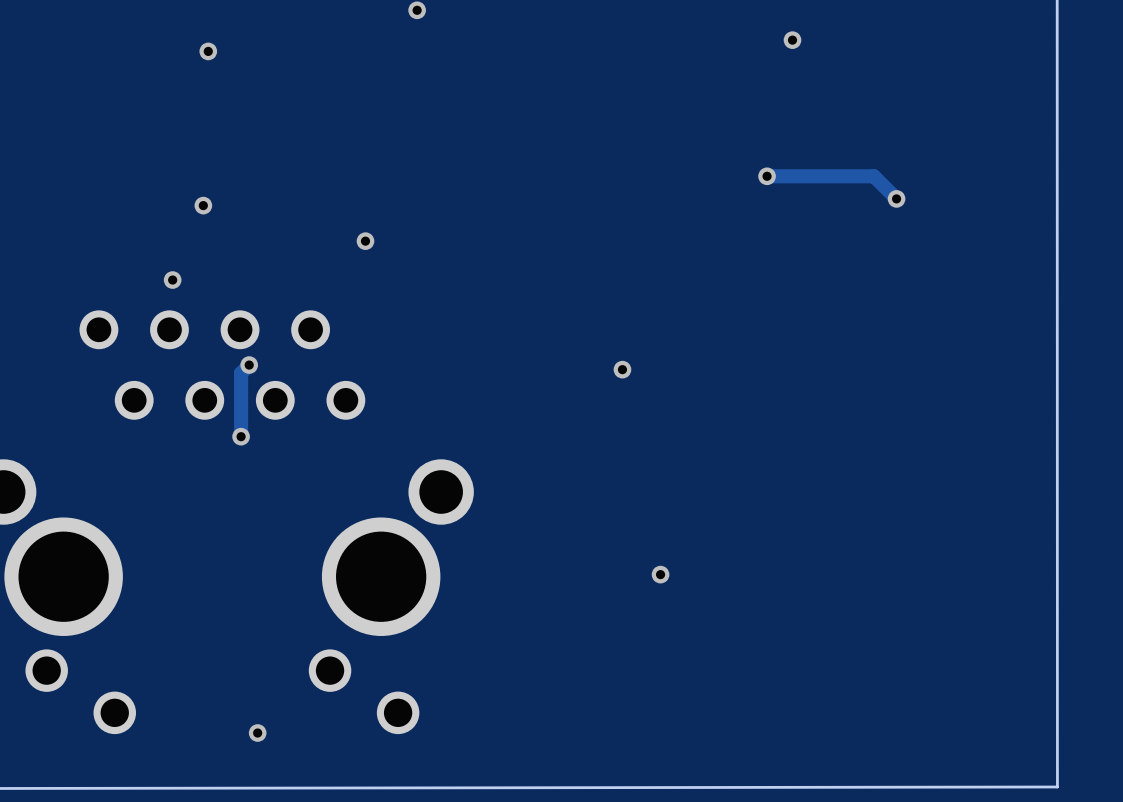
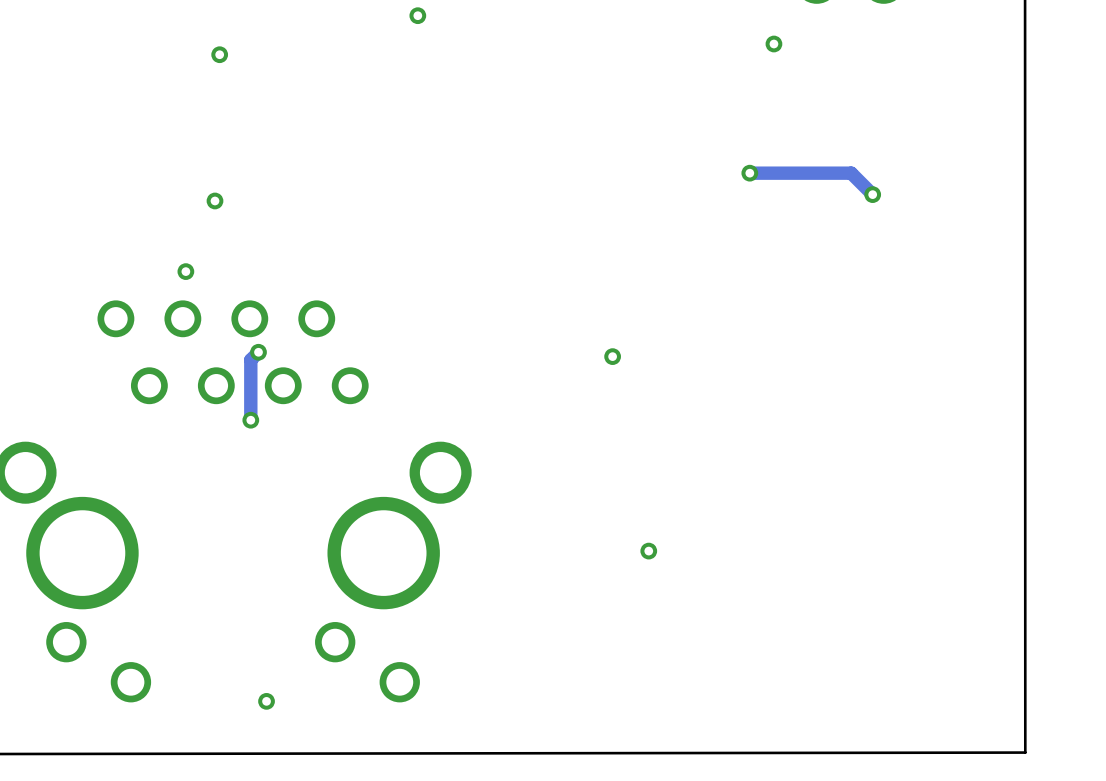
via: (365, 241) -> none

